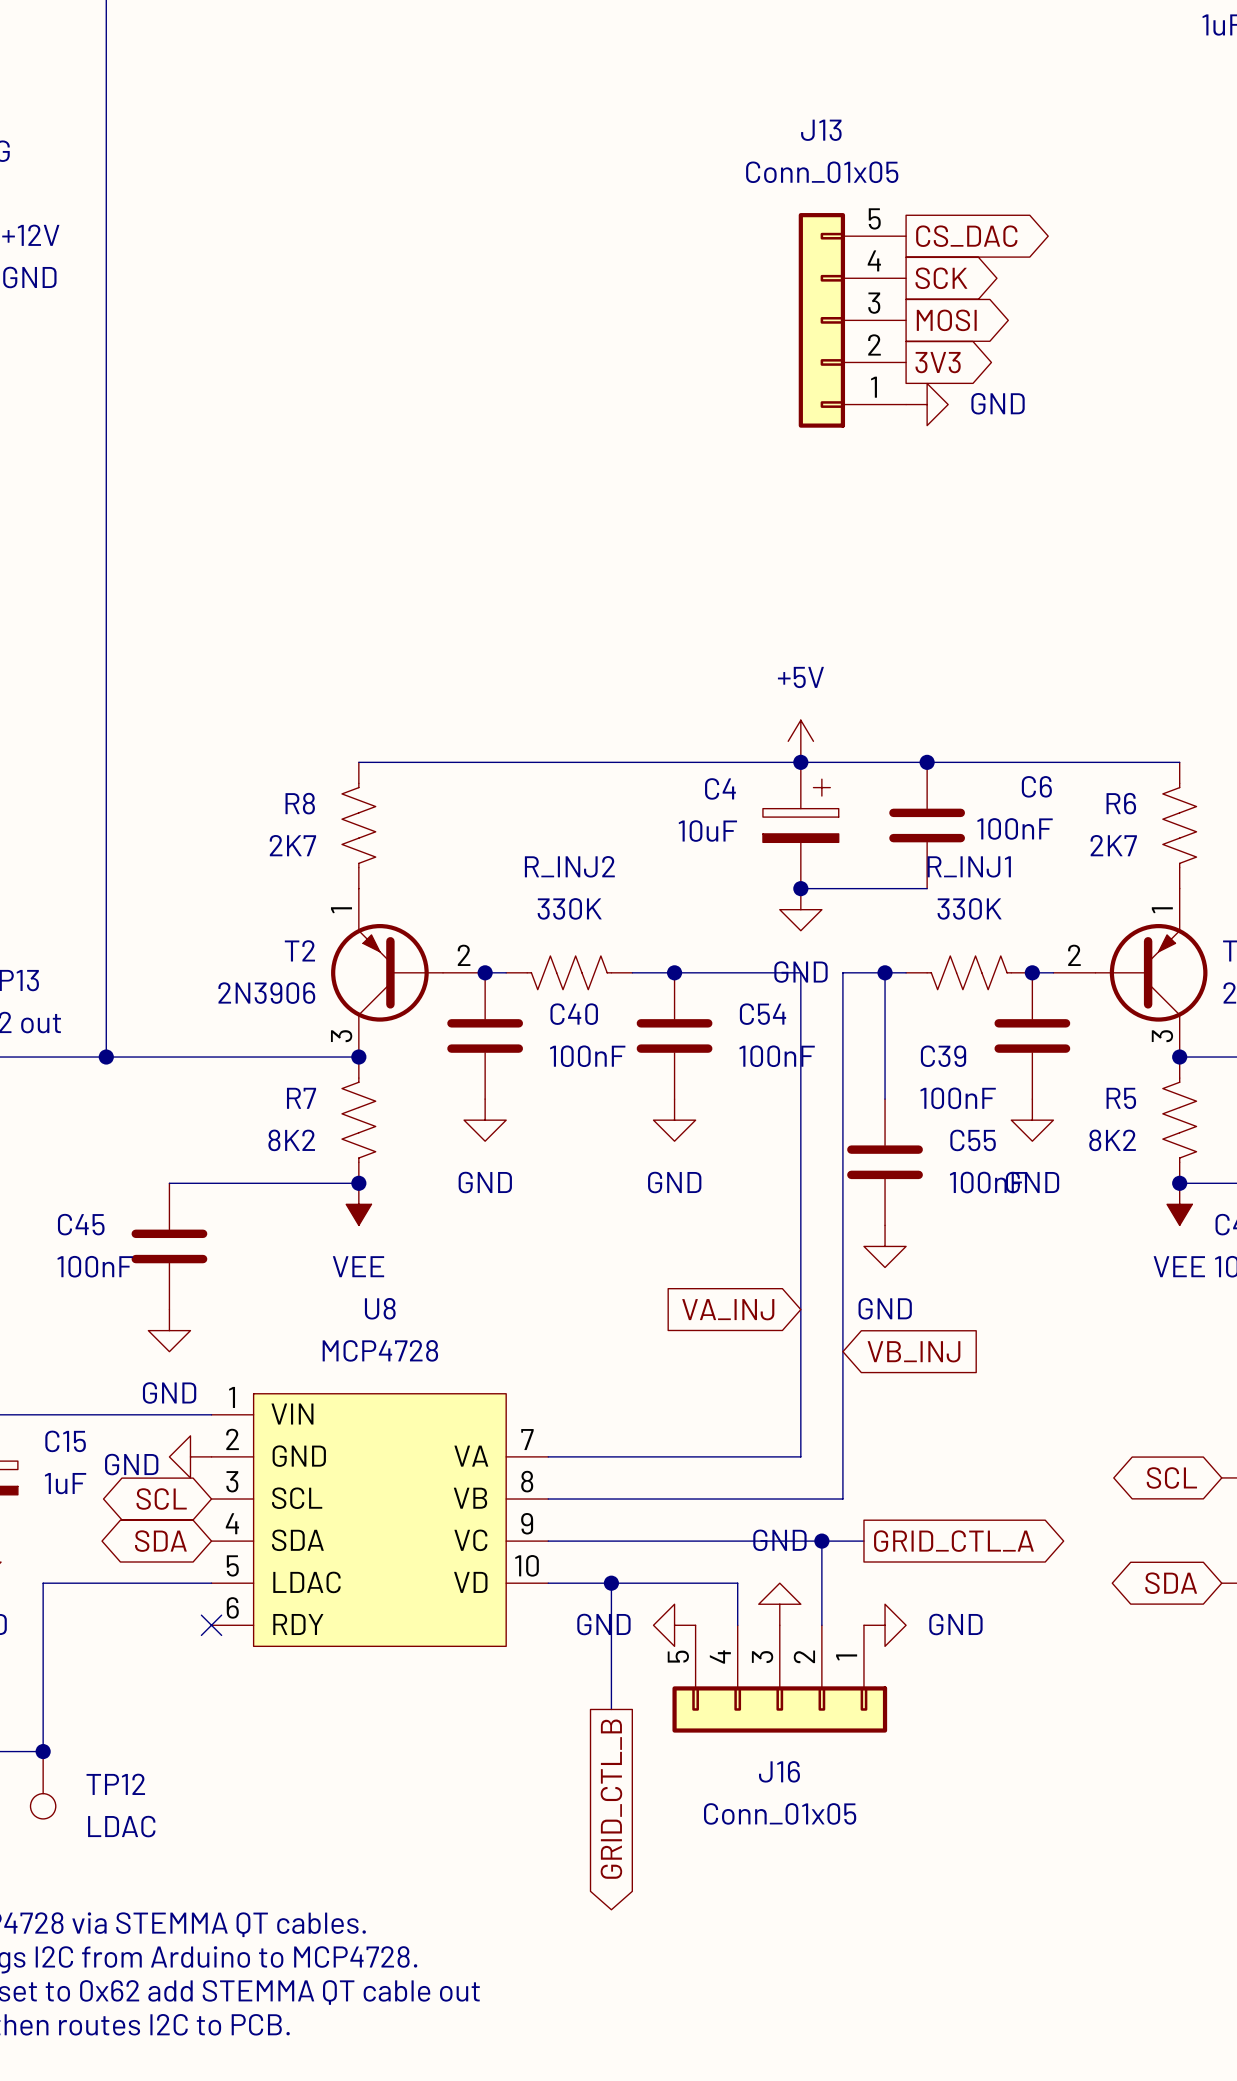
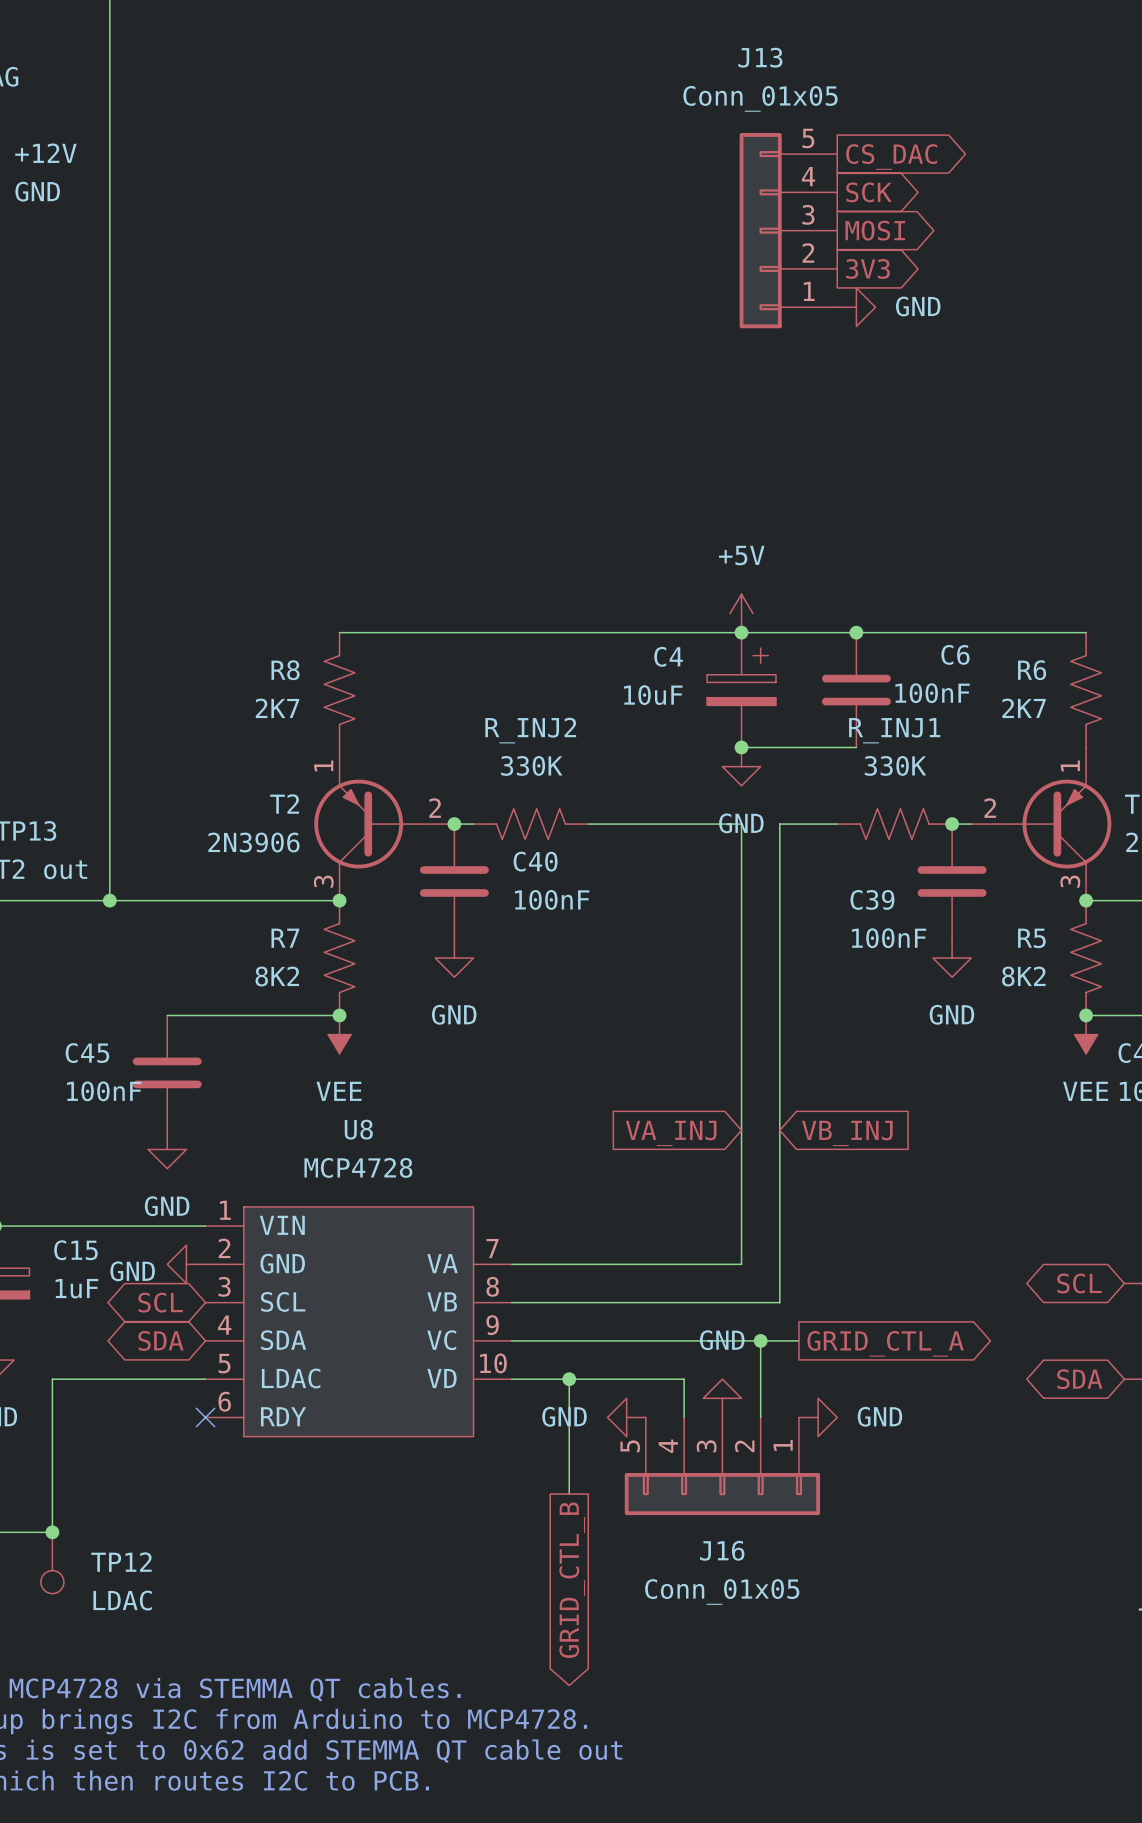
junction: (674, 972) -> none
wire: (885, 972) (885, 1099) -> none
junction: (885, 972) -> none
C54: 100nF (674, 1035) -> none
power symbol: GND (674, 1120) -> none
C55: 100nF (885, 1162) -> none
power symbol: GND (885, 1246) -> none
global label position: VB_INJ (914, 1351) -> VB_INJ (847, 1133)

